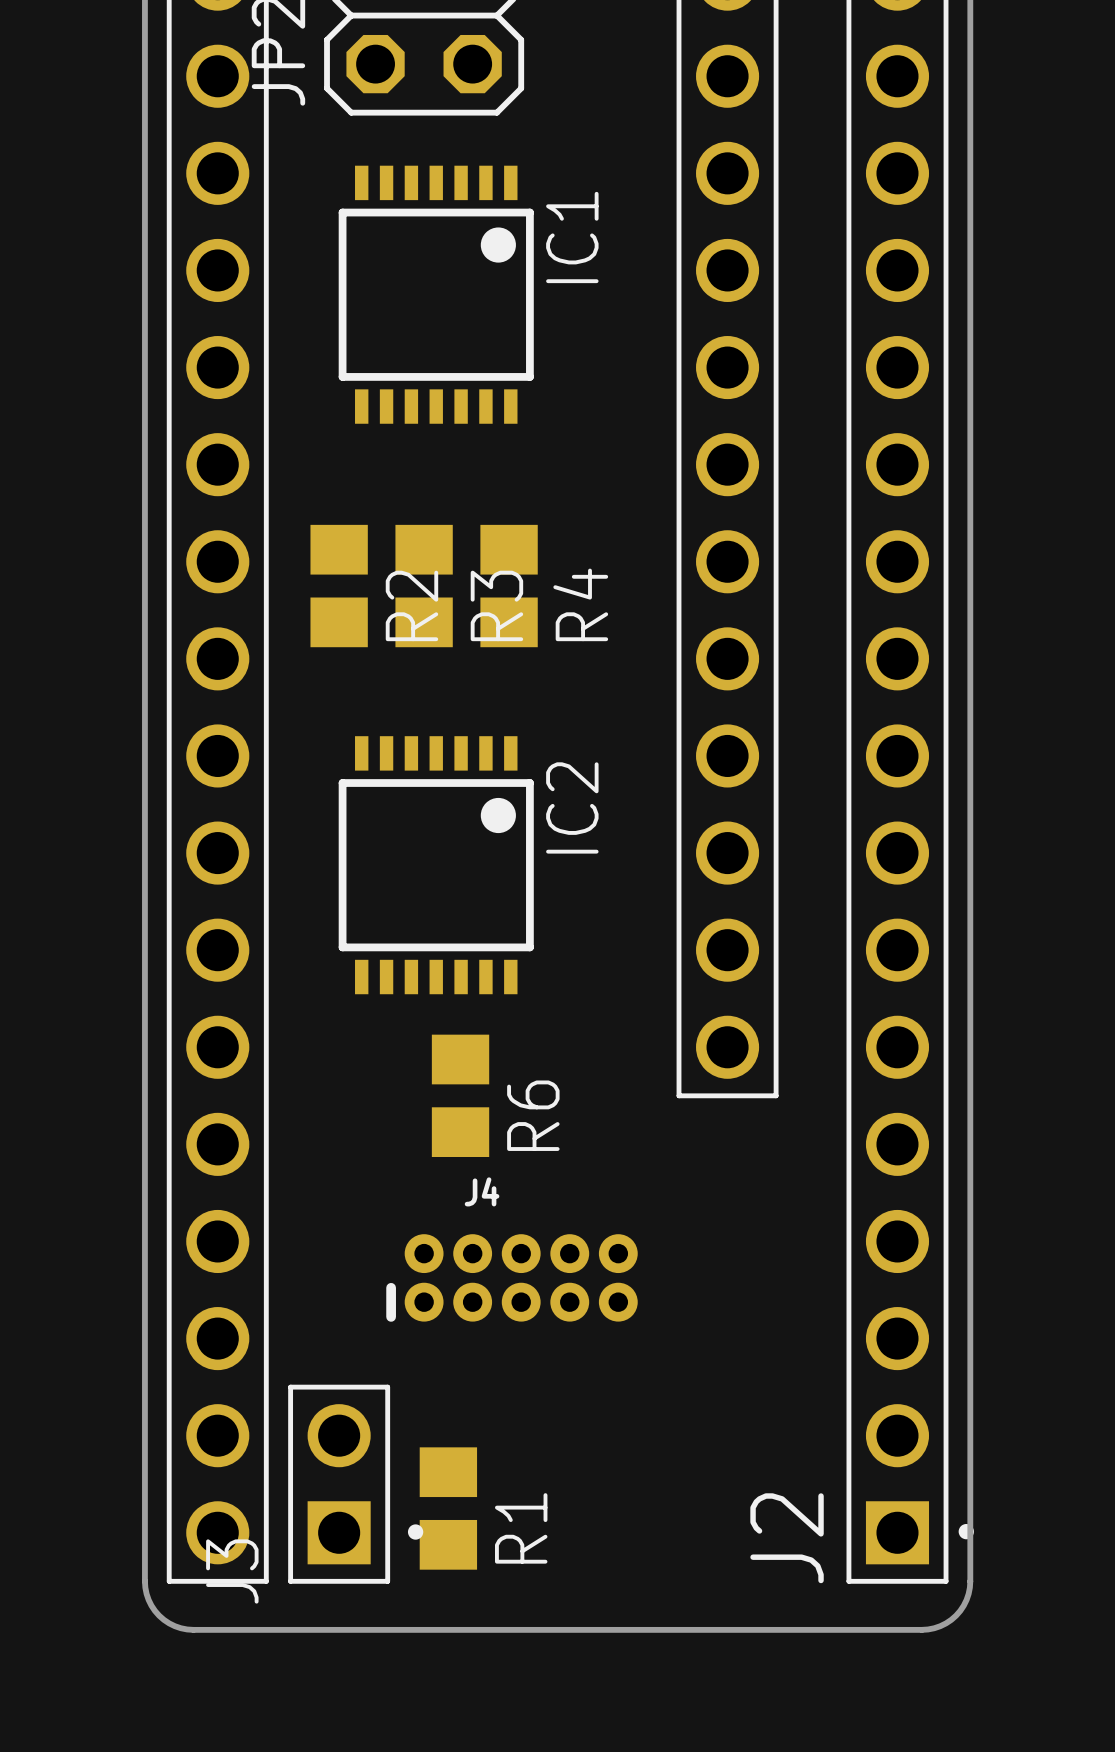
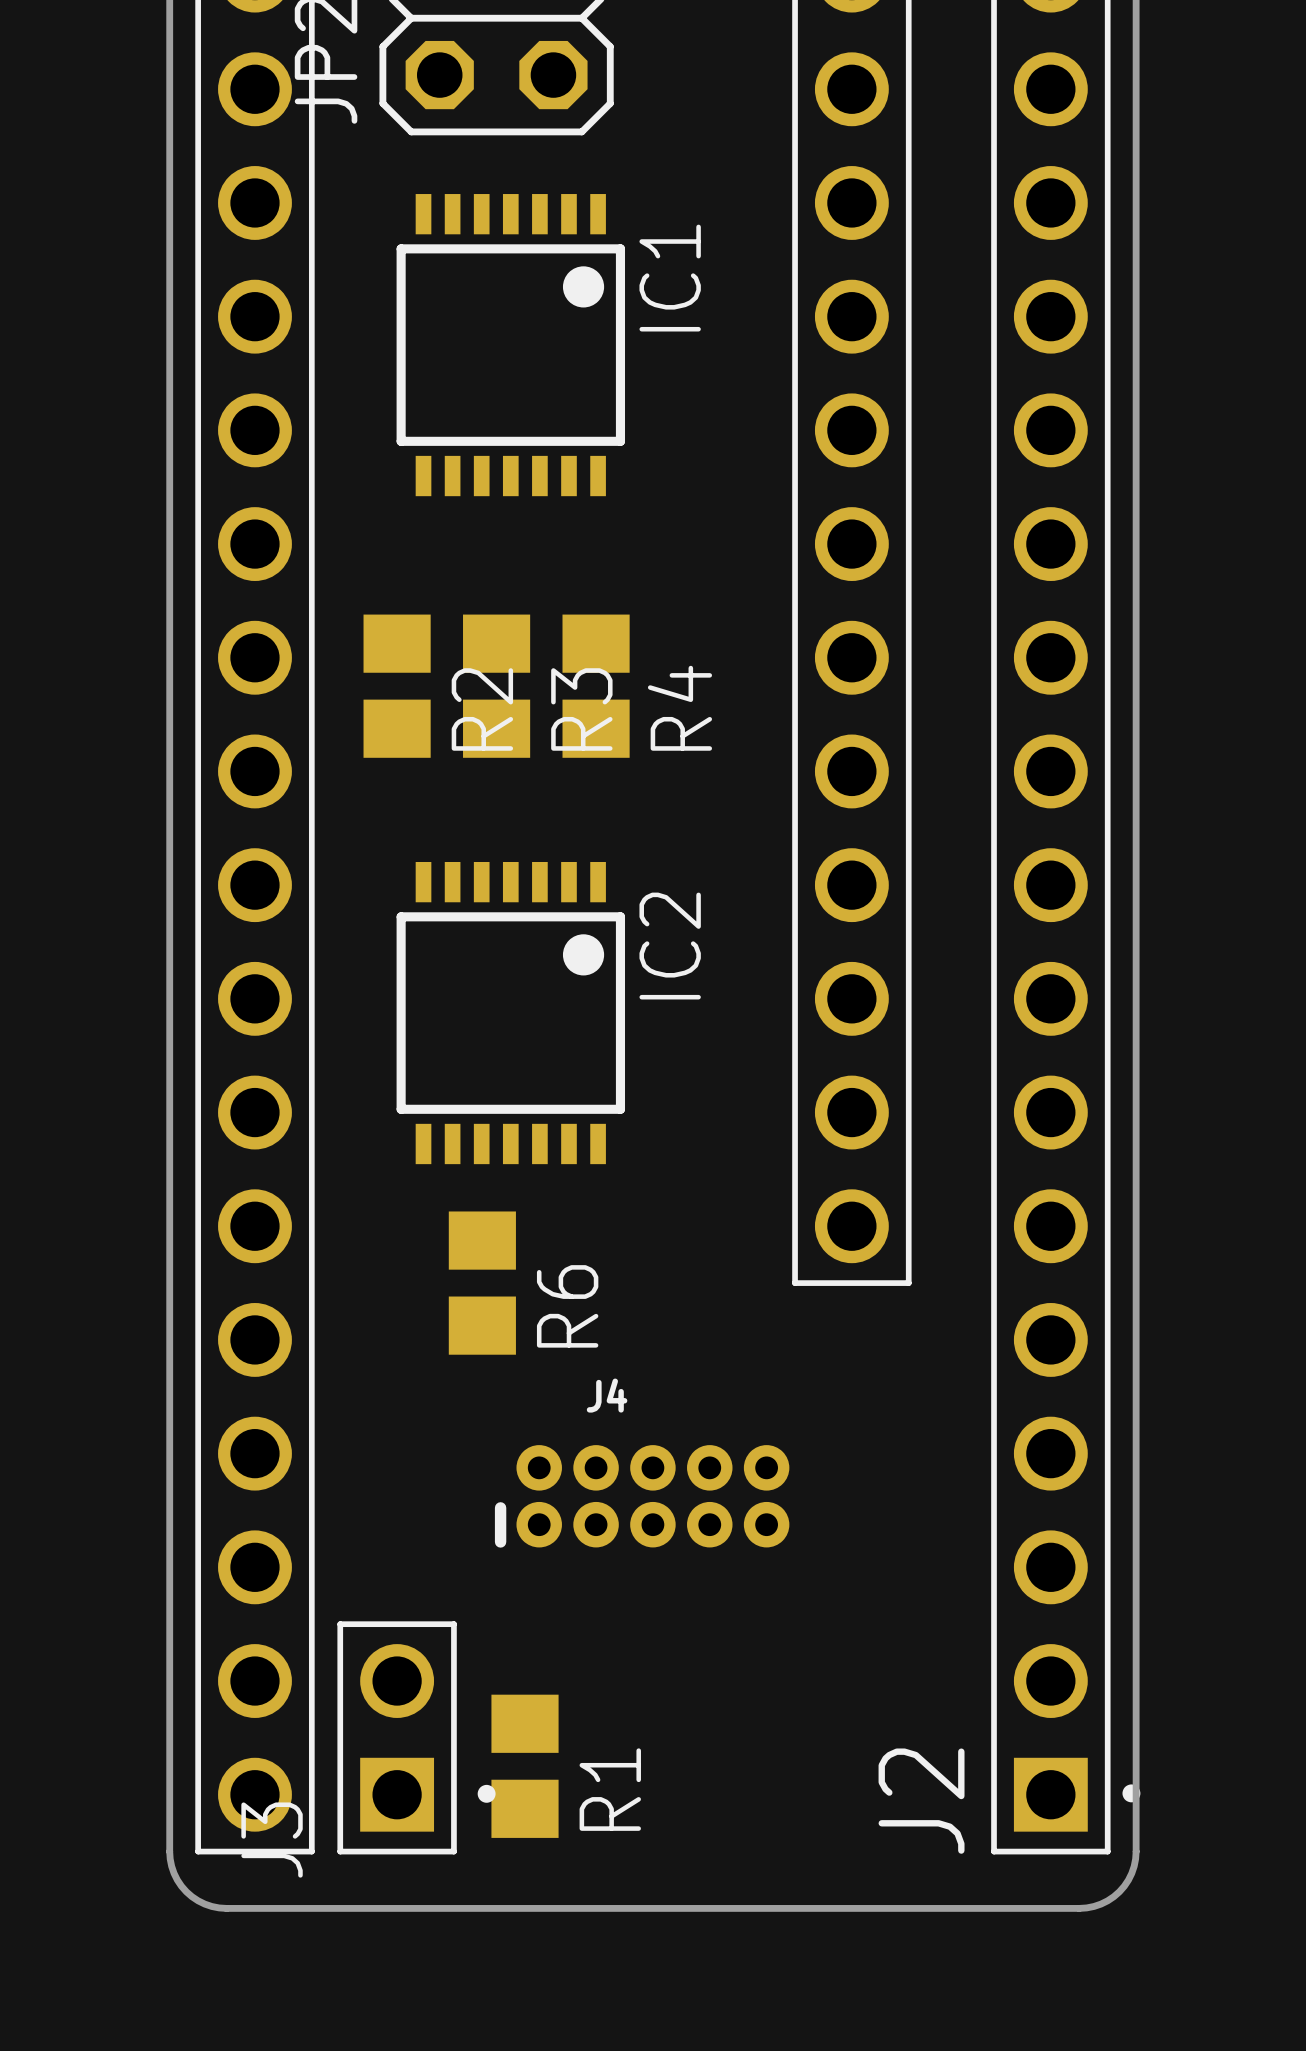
R6 position: (460, 1095) -> (482, 1283)
J4 position: (512, 1277) -> (642, 1496)

